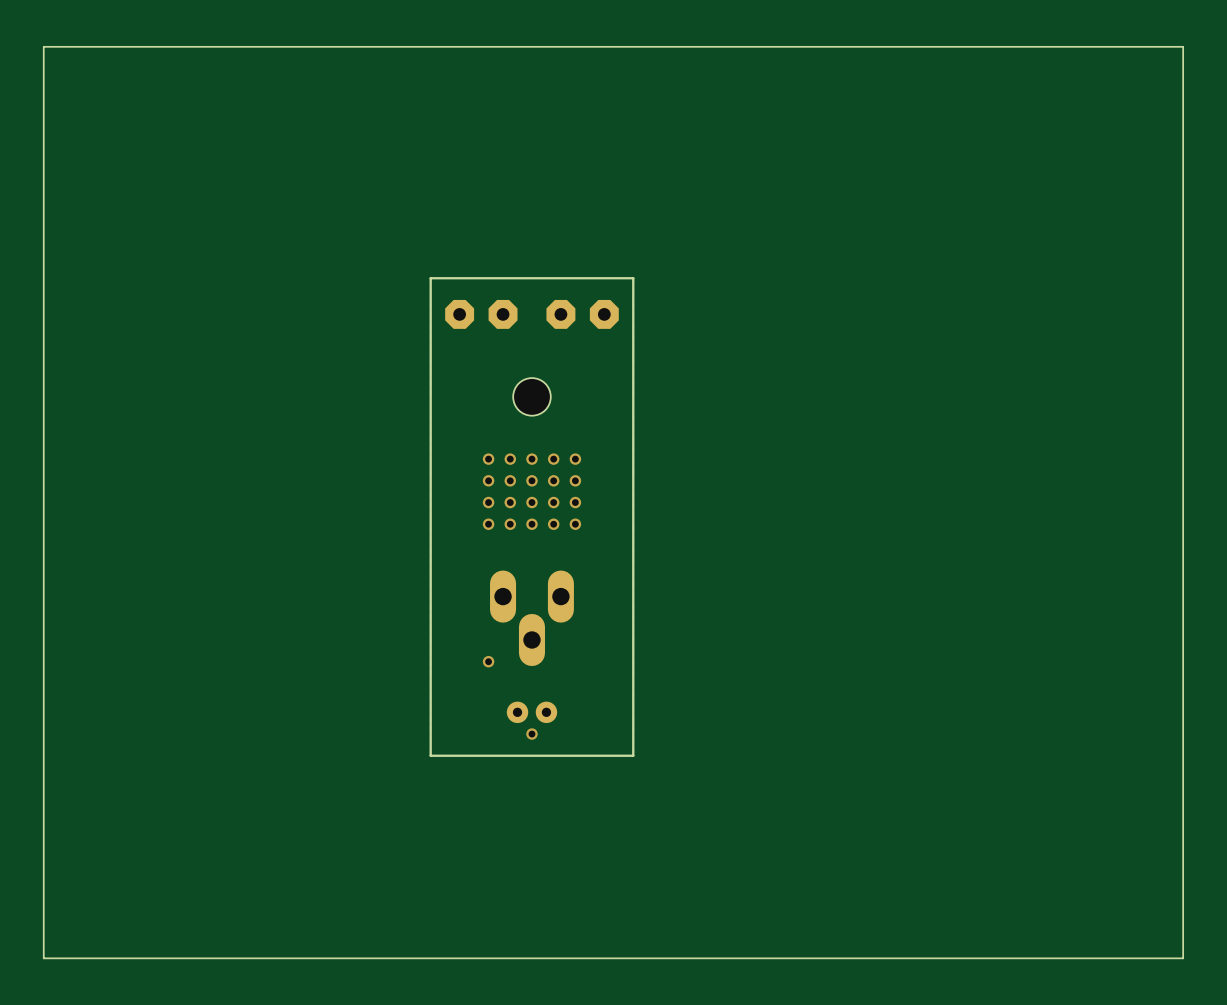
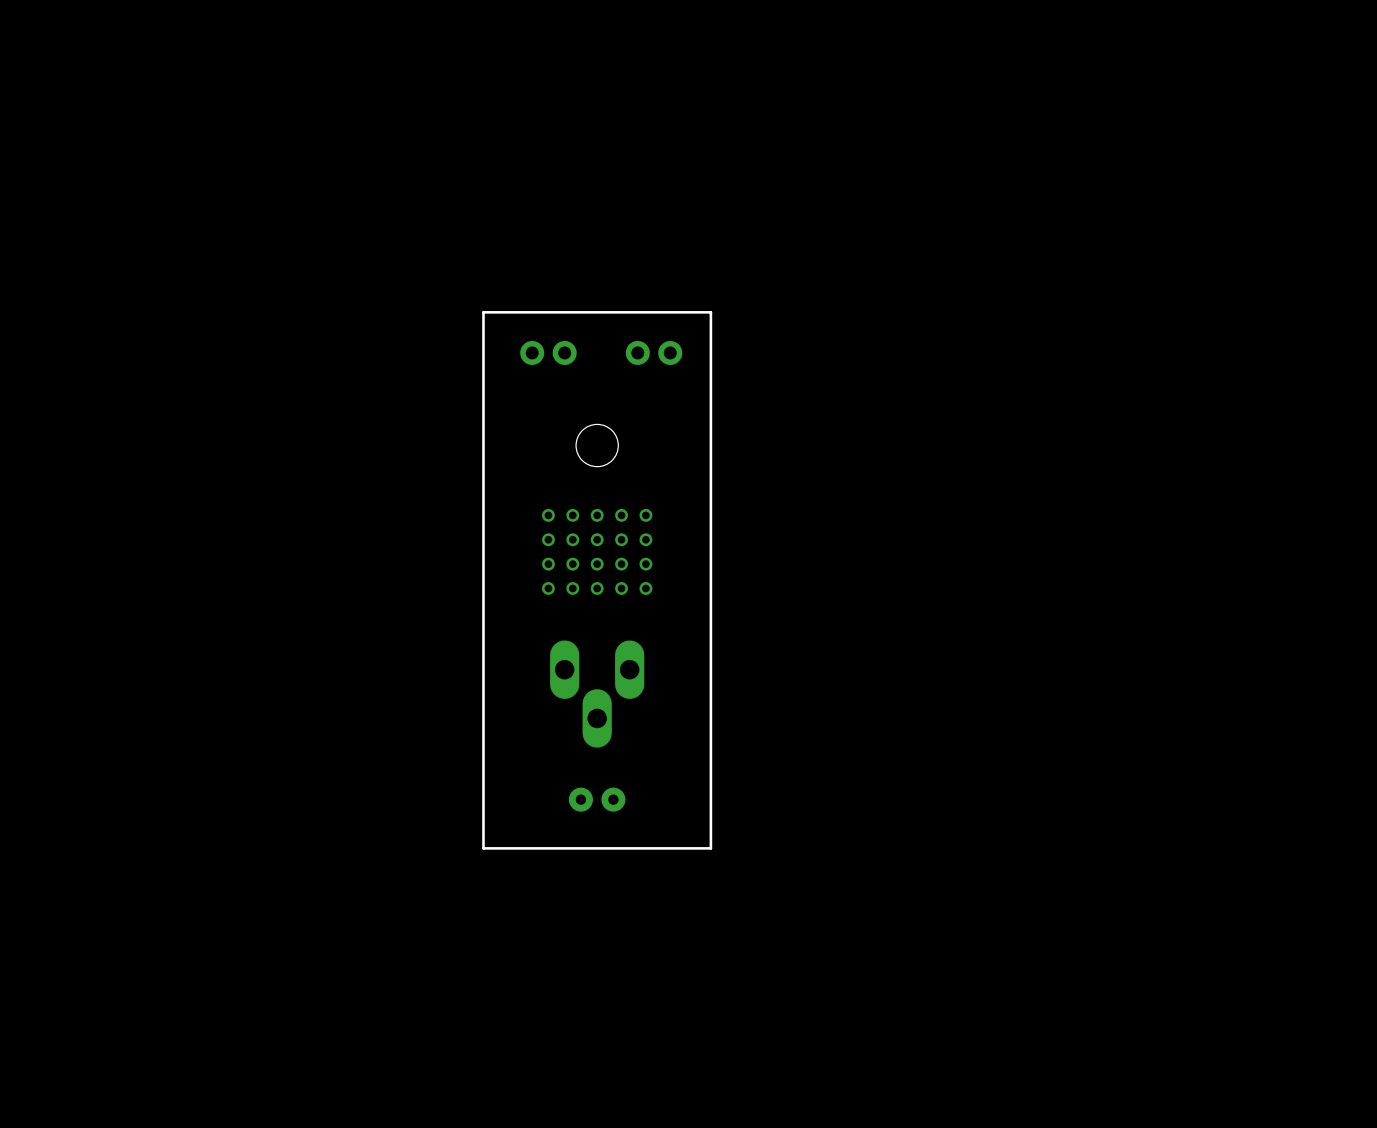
board edge: (1183, 46) (43, 46) (43, 958) (1183, 958) (1183, 46) -> none
part: (459, 314) -> none
part: none -> (548, 352)
part: (503, 314) -> none
part: (560, 314) -> none
part: none -> (654, 352)
part: (604, 314) -> none
via: (488, 661) -> none
via: (531, 734) -> none

